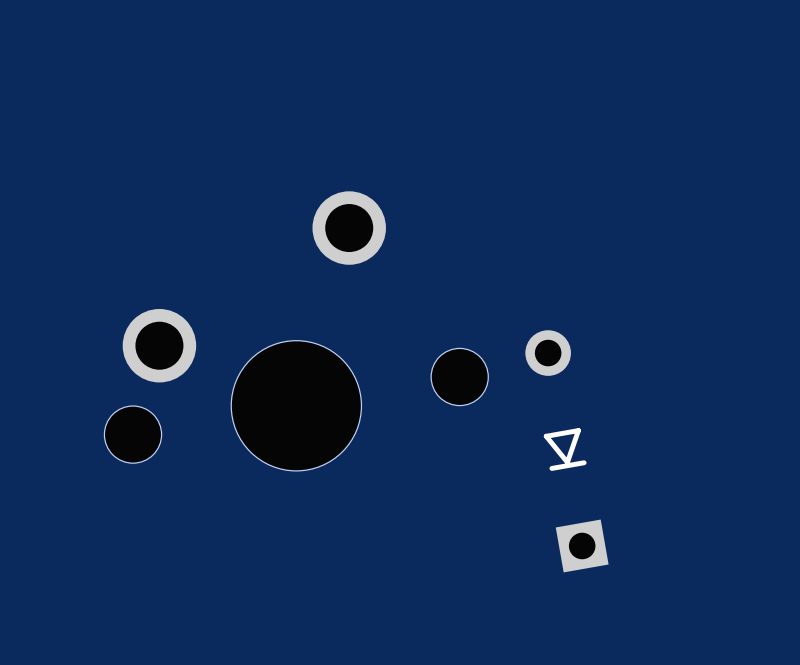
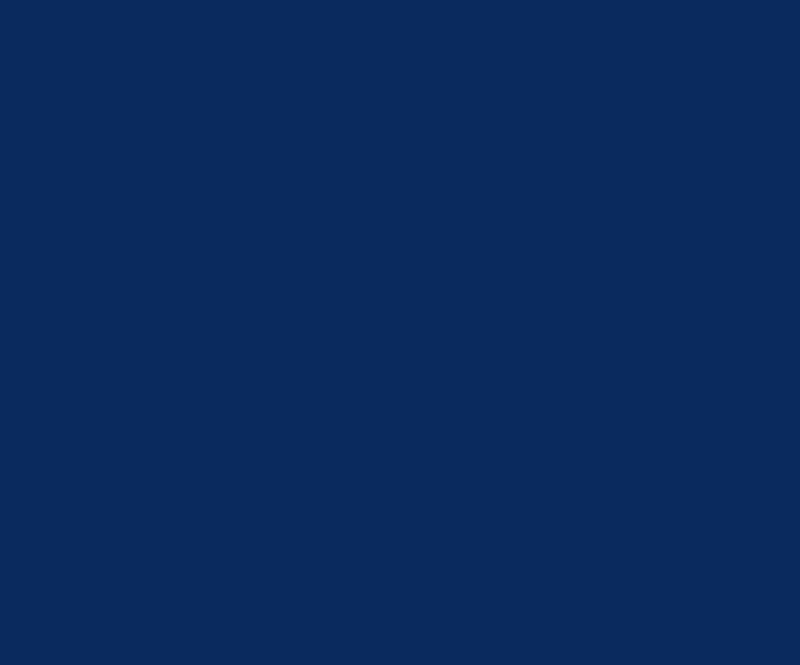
part: (296, 331) -> none
part: (566, 451) -> none

